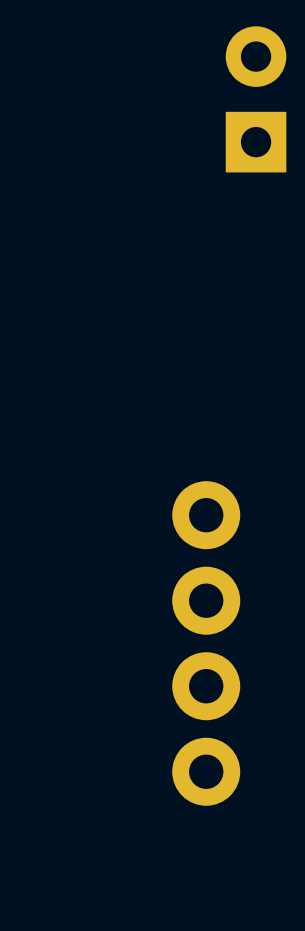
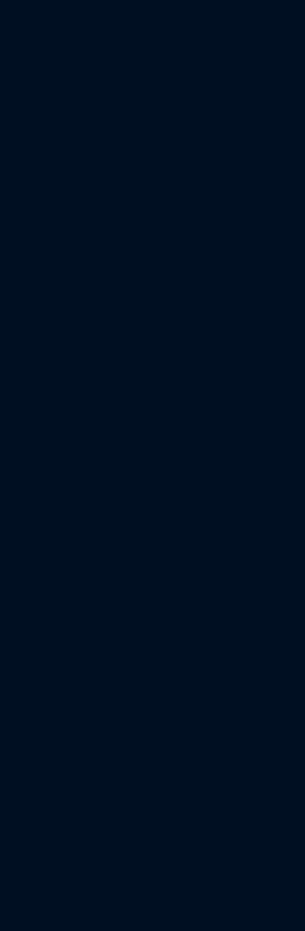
part: (256, 99) -> none
part: (206, 643) -> none

